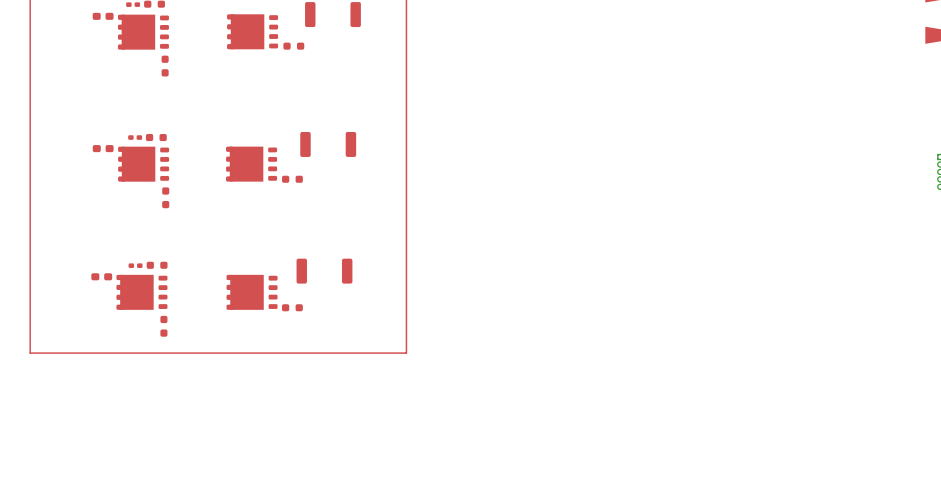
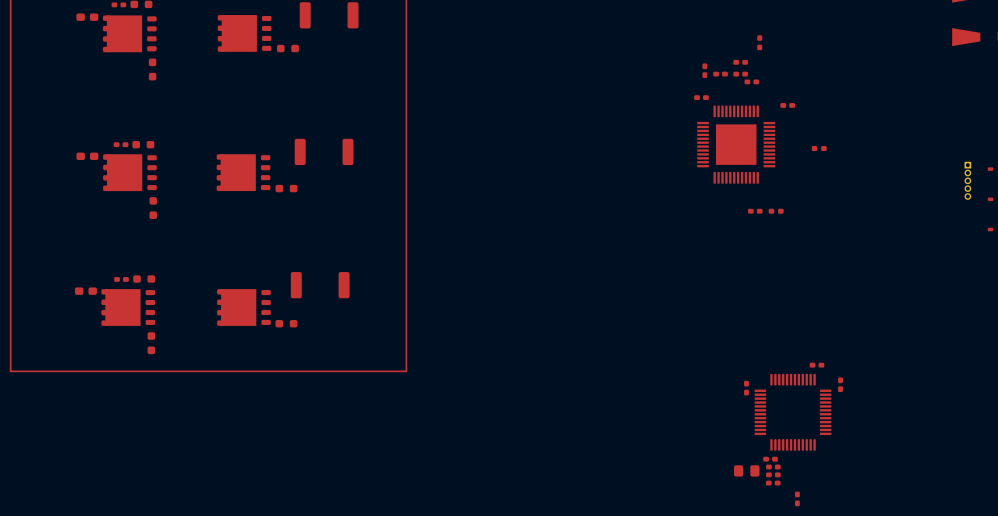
part: none -> (759, 42)
part: none -> (740, 62)
part: none -> (704, 70)
part: none -> (720, 74)
part: none -> (740, 74)
part: none -> (751, 81)
part: none -> (701, 97)
part: none -> (787, 105)
part: none -> (736, 144)
part: none -> (819, 148)
part: none -> (755, 211)
part: none -> (776, 211)
part: none -> (816, 365)
part: none -> (840, 384)
part: none -> (746, 388)
part: none -> (793, 412)
part: none -> (770, 459)
part: none -> (773, 467)
part: none -> (746, 470)
part: none -> (773, 474)
part: none -> (773, 483)
part: none -> (797, 498)

